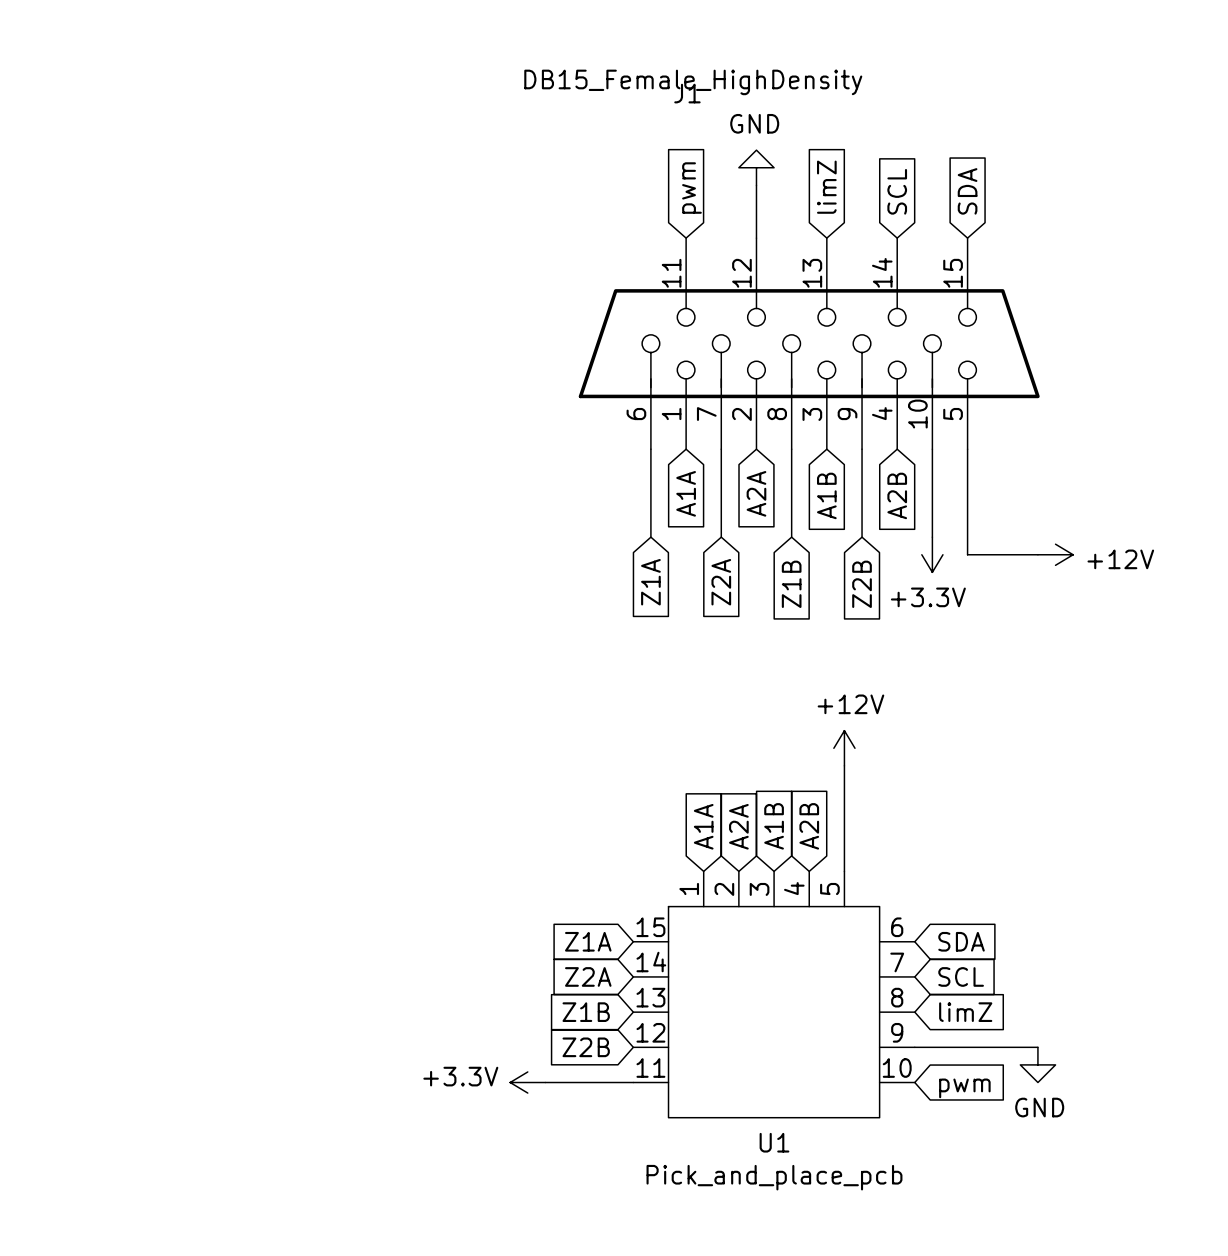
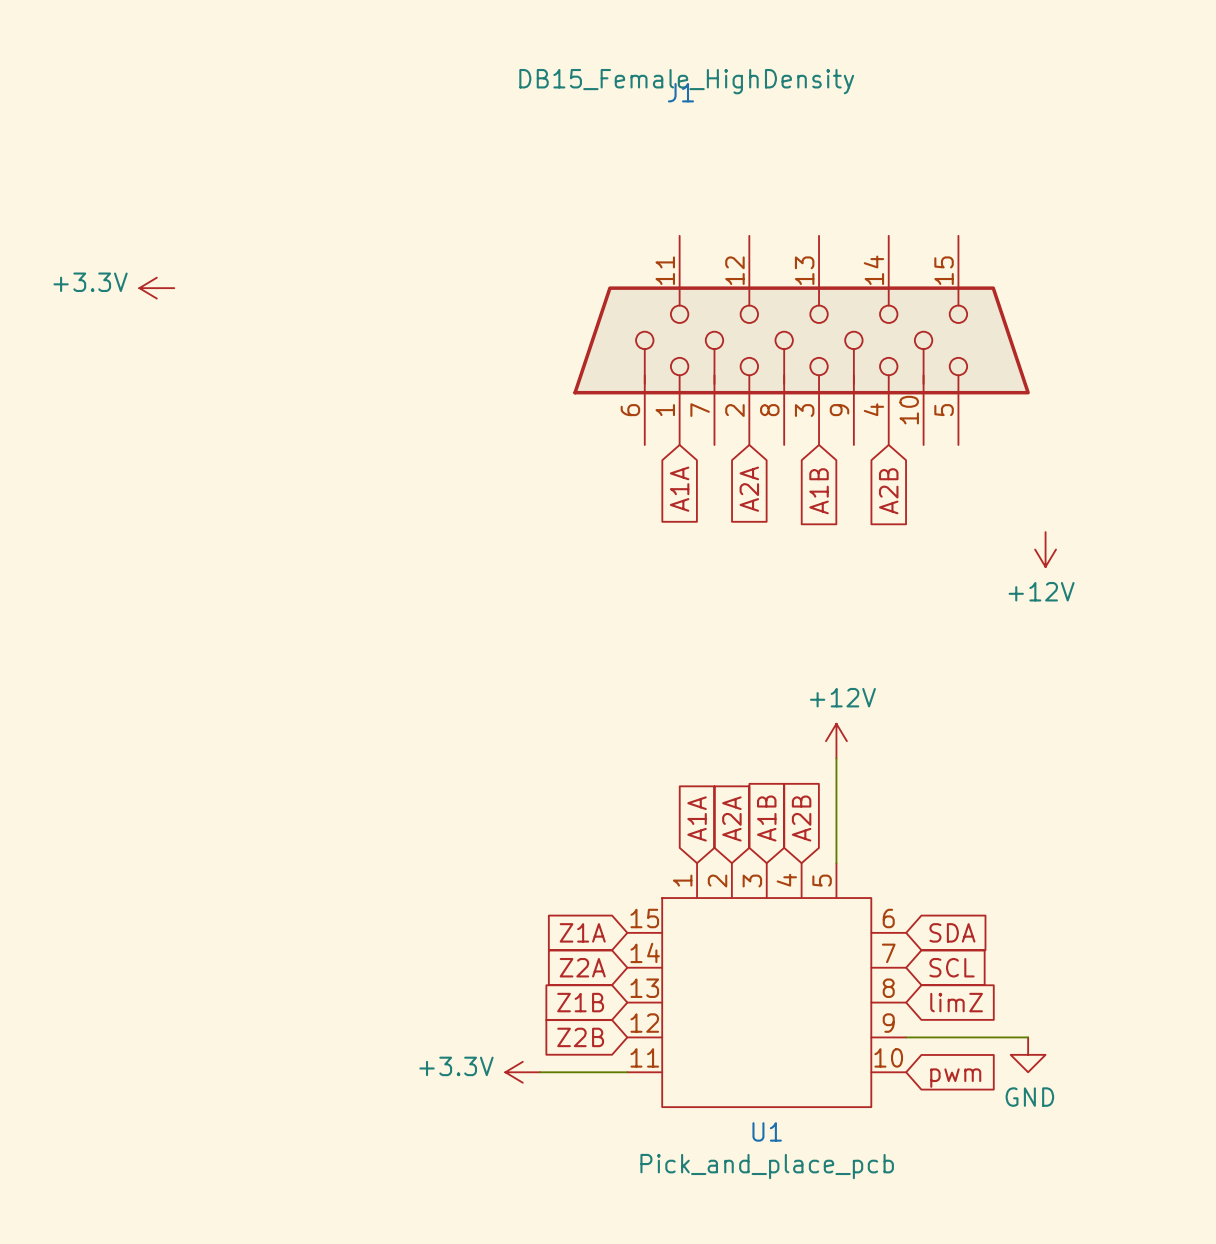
power symbol: GND (756, 167) -> none
wire: (756, 185) (756, 238) -> none
global label: limZ (826, 187) -> none
global label: pwm (691, 188) -> none
global label: SCL (897, 191) -> none
global label: SDA (967, 191) -> none
power symbol: none -> +3.3V (156, 288)
wire: (650, 449) (650, 537) -> none
wire: (721, 449) (721, 537) -> none
wire: (791, 449) (791, 537) -> none
wire: (862, 449) (862, 537) -> none
wire: (932, 449) (932, 537) -> none
wire: (967, 449) (967, 554) (1037, 554) -> none
power symbol: +3.3V (932, 554) -> none
power symbol rotation: 0° (1055, 554) -> 90° clockwise (1045, 549)
global label: Z1A (650, 582) -> none
global label: Z2A (721, 582) -> none
global label: Z1B (791, 584) -> none
global label: Z2B (862, 584) -> none

